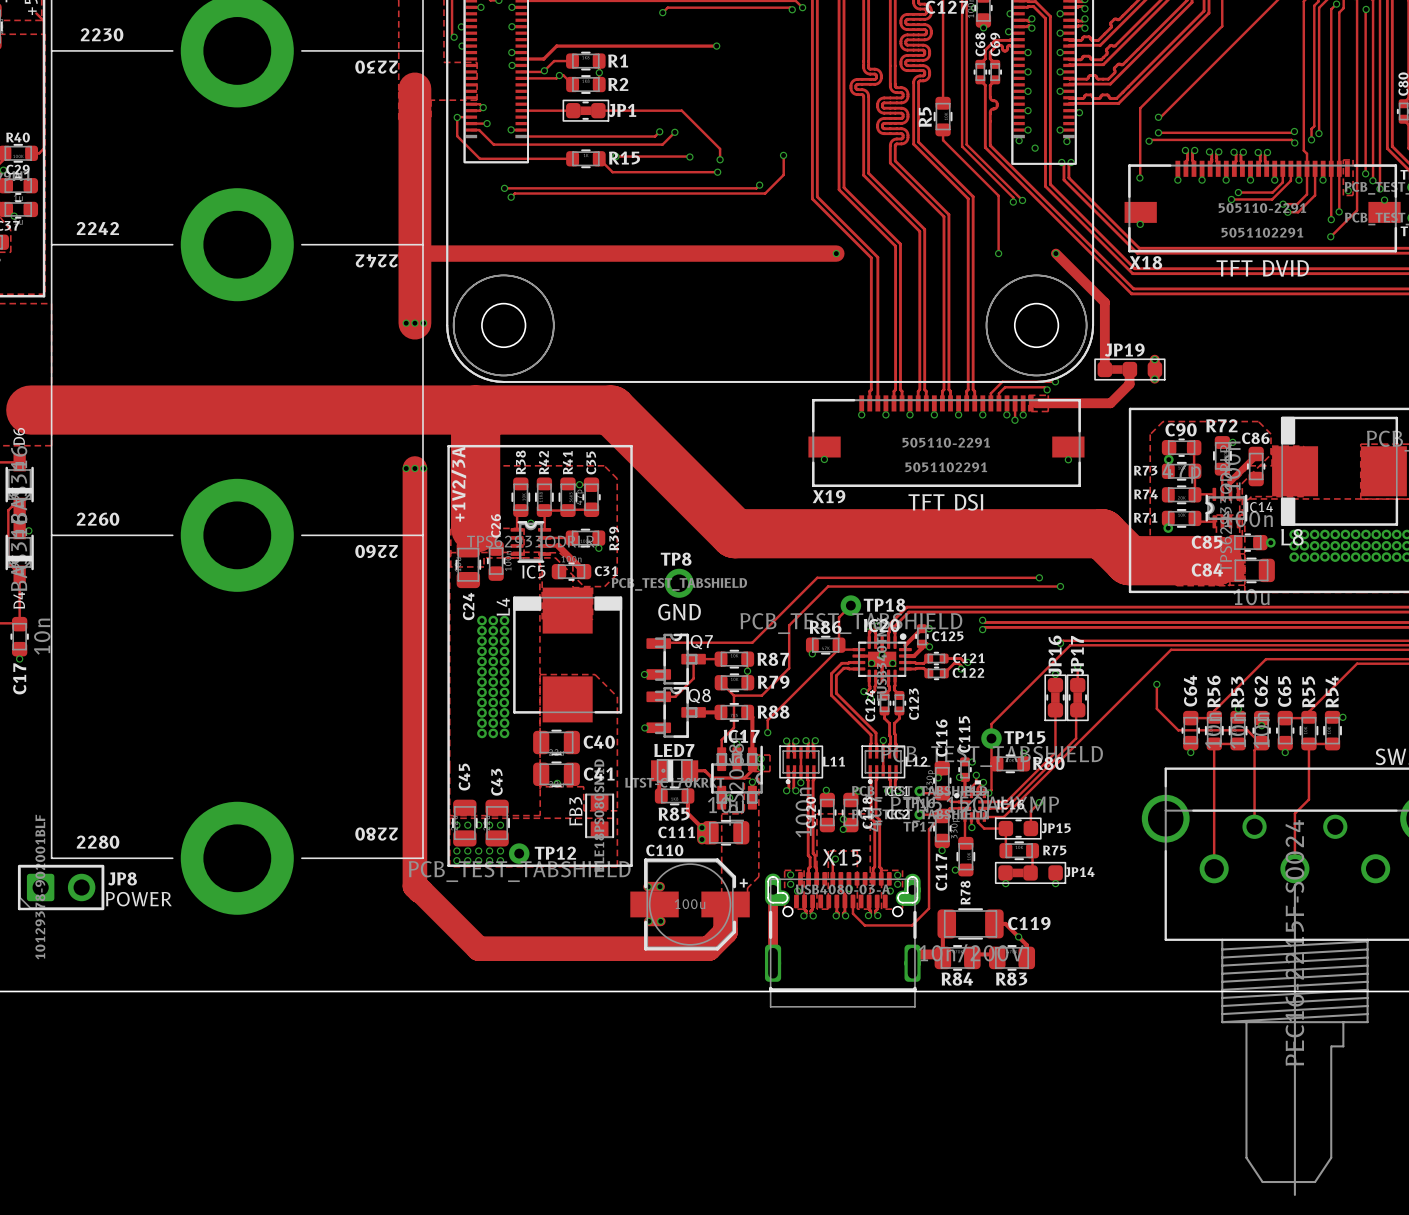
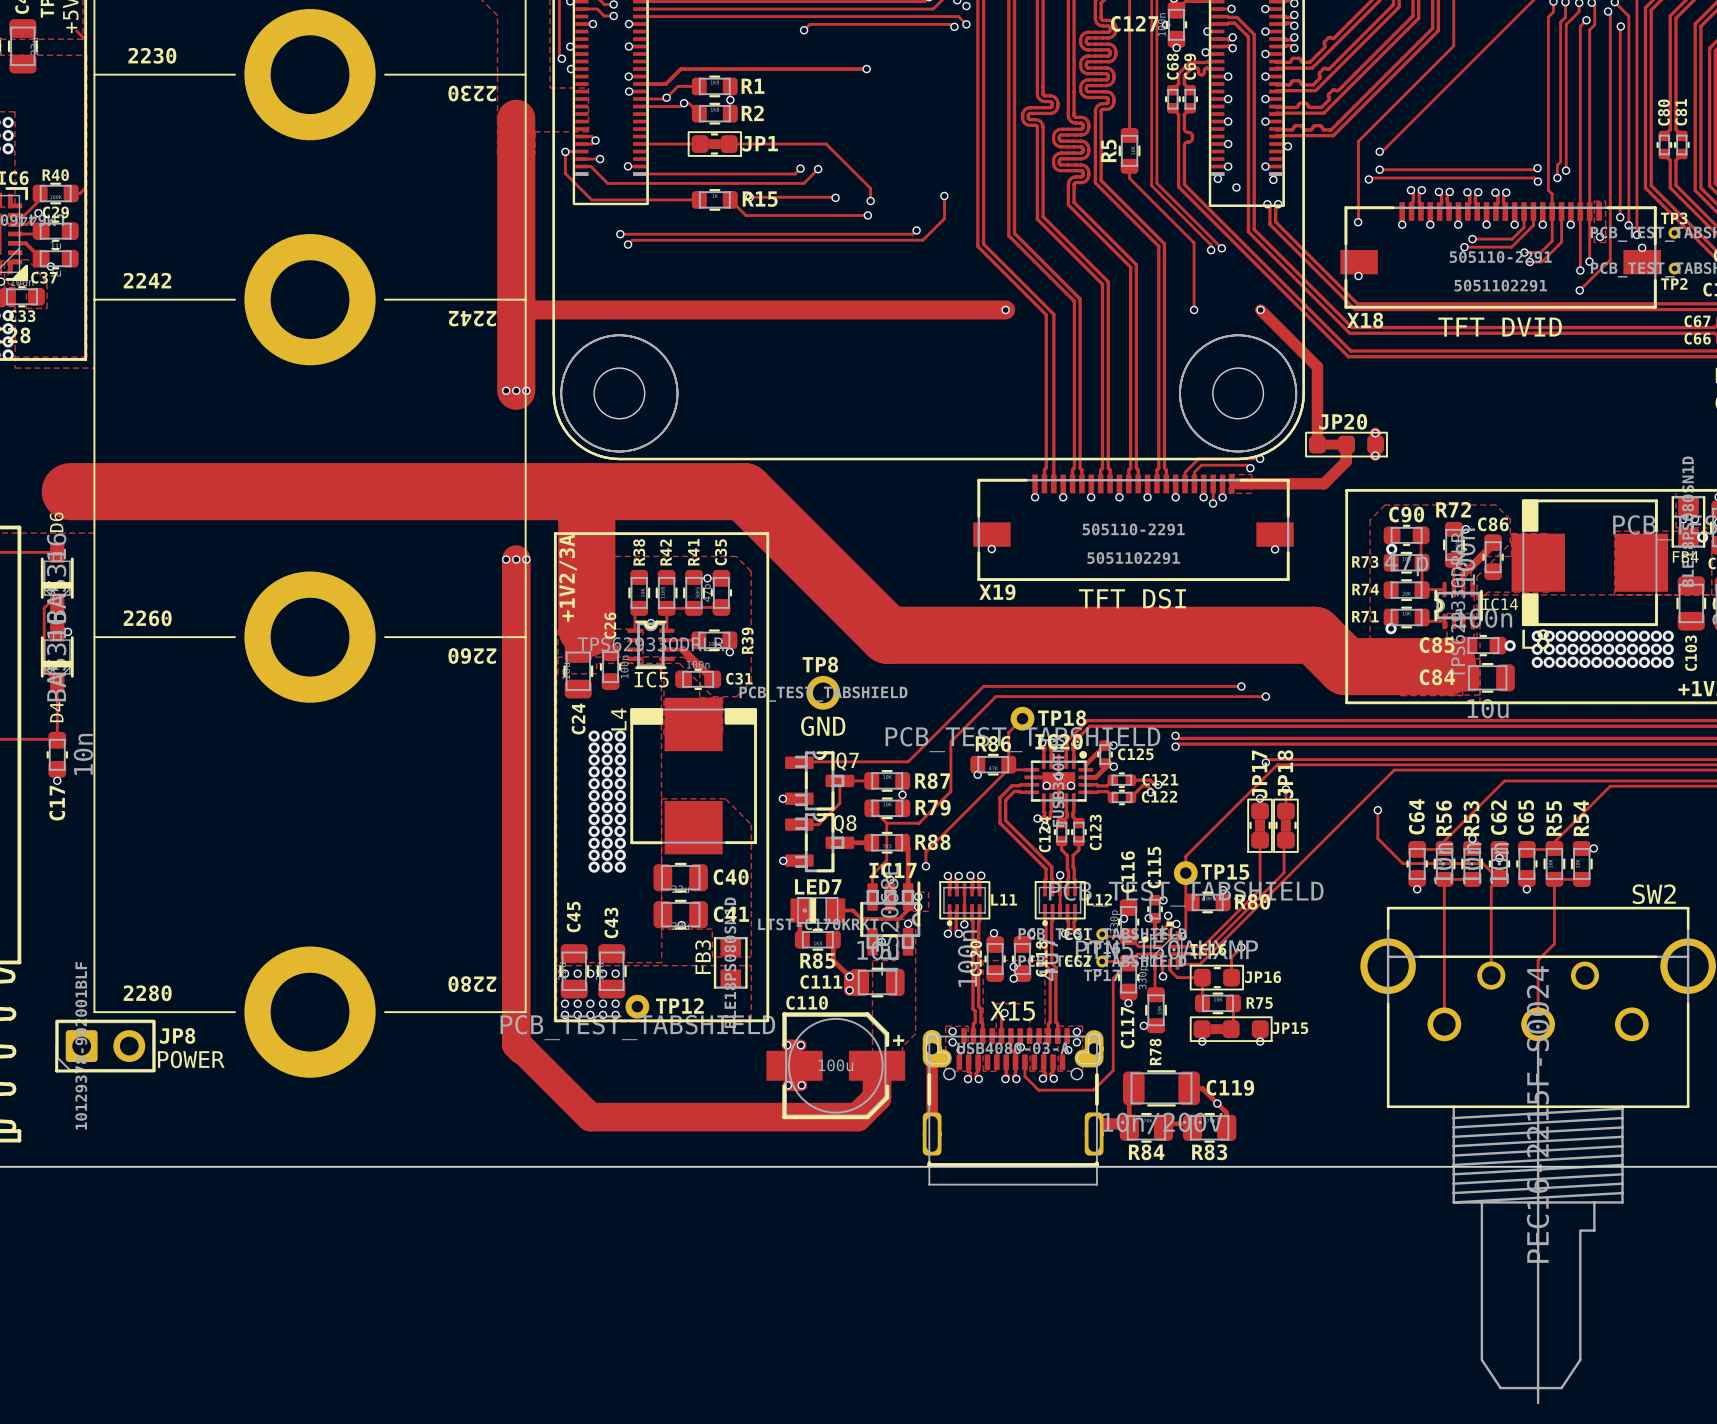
JP19 name: JP19 (1124, 350) -> JP20 (1343, 421)
JP16 name: JP16 (1055, 655) -> JP17 (1259, 774)
JP17 name: JP17 (1077, 655) -> JP18 (1285, 774)
JP15 name: JP15 (1056, 828) -> JP16 (1263, 977)
JP14 name: JP14 (1079, 872) -> JP15 (1290, 1028)

